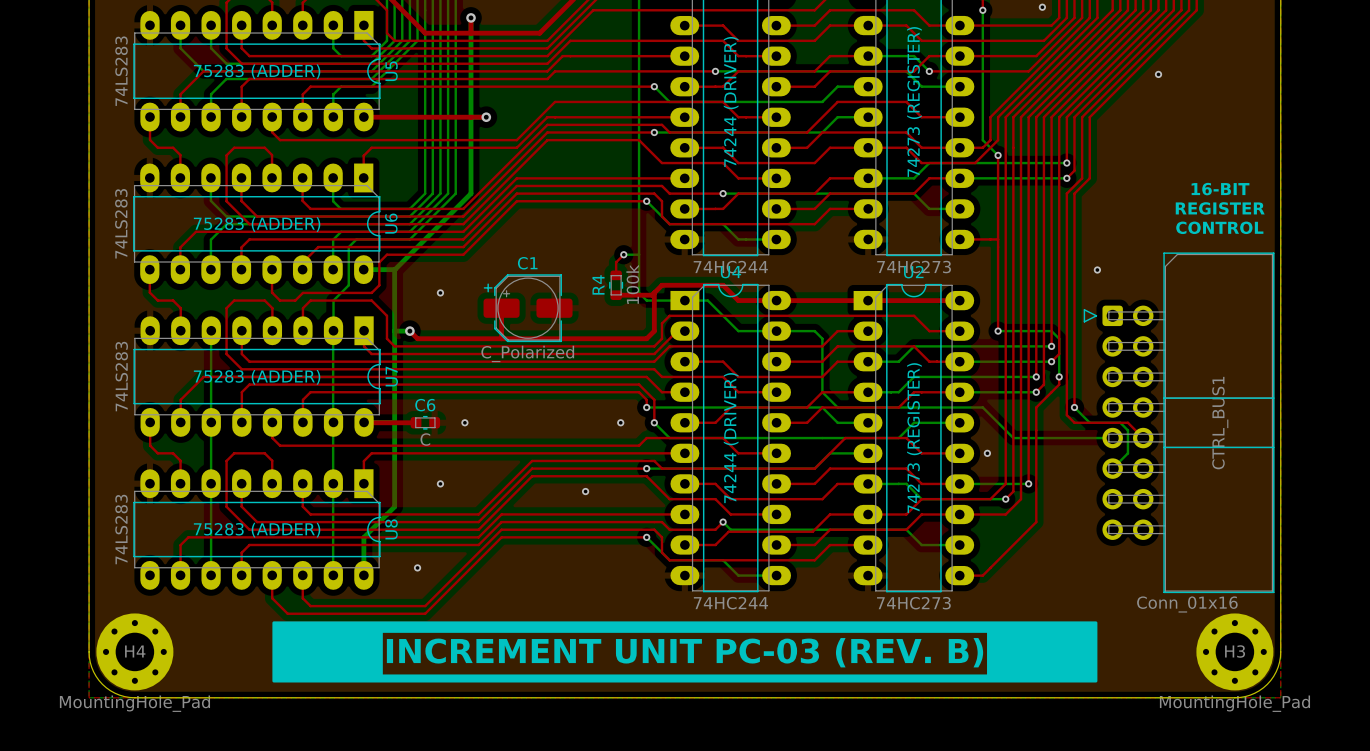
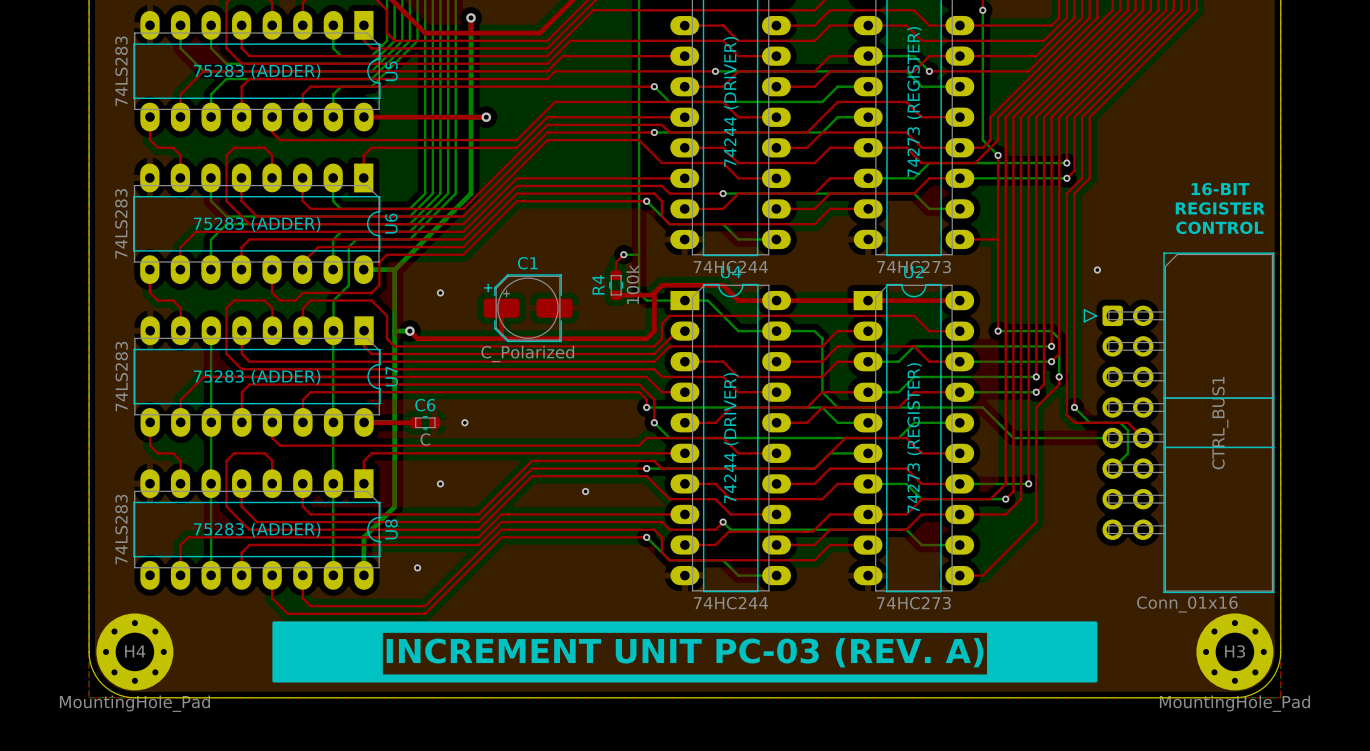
via: (1042, 7) -> none
via: (1158, 74) -> none
via: (620, 422) -> none
via: (987, 453) -> none
text: INCREMENT UNIT PC-03 (REV. B) (685, 652) -> INCREMENT UNIT PC-03 (REV. A) (685, 652)

